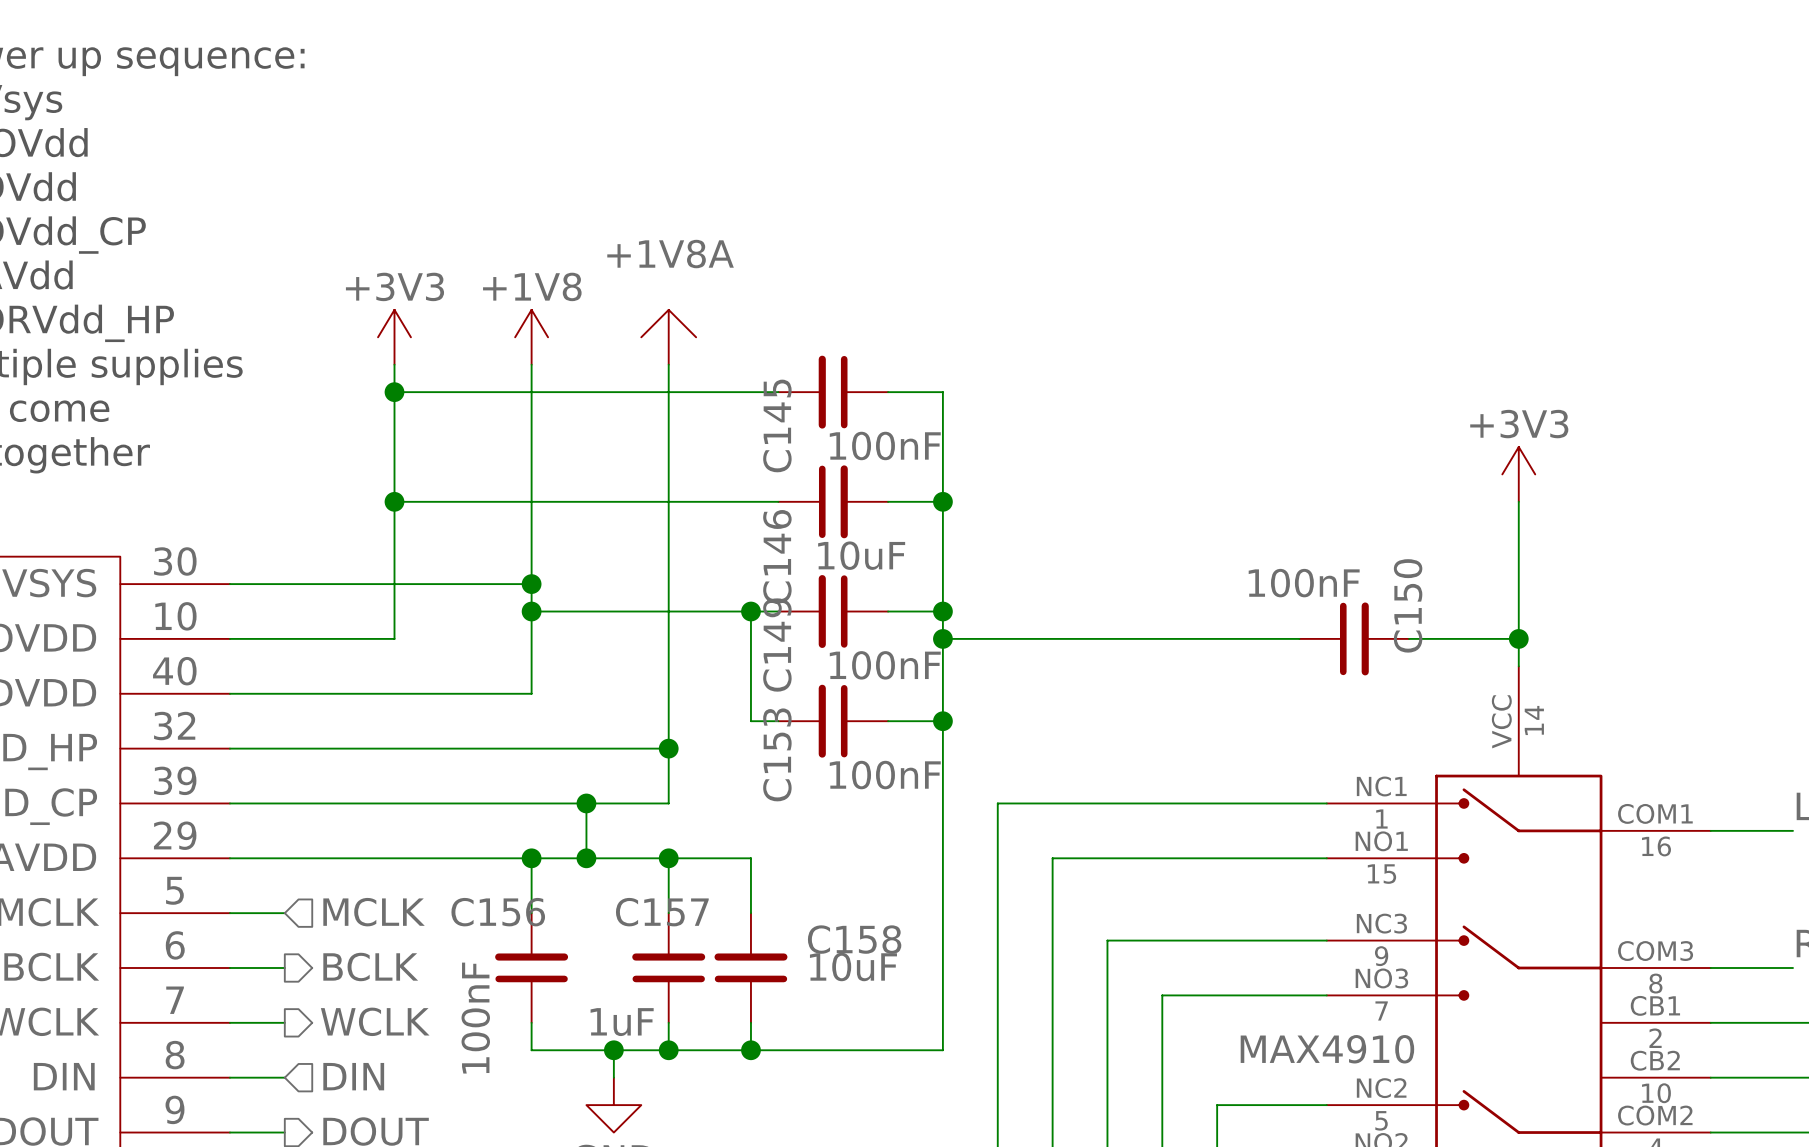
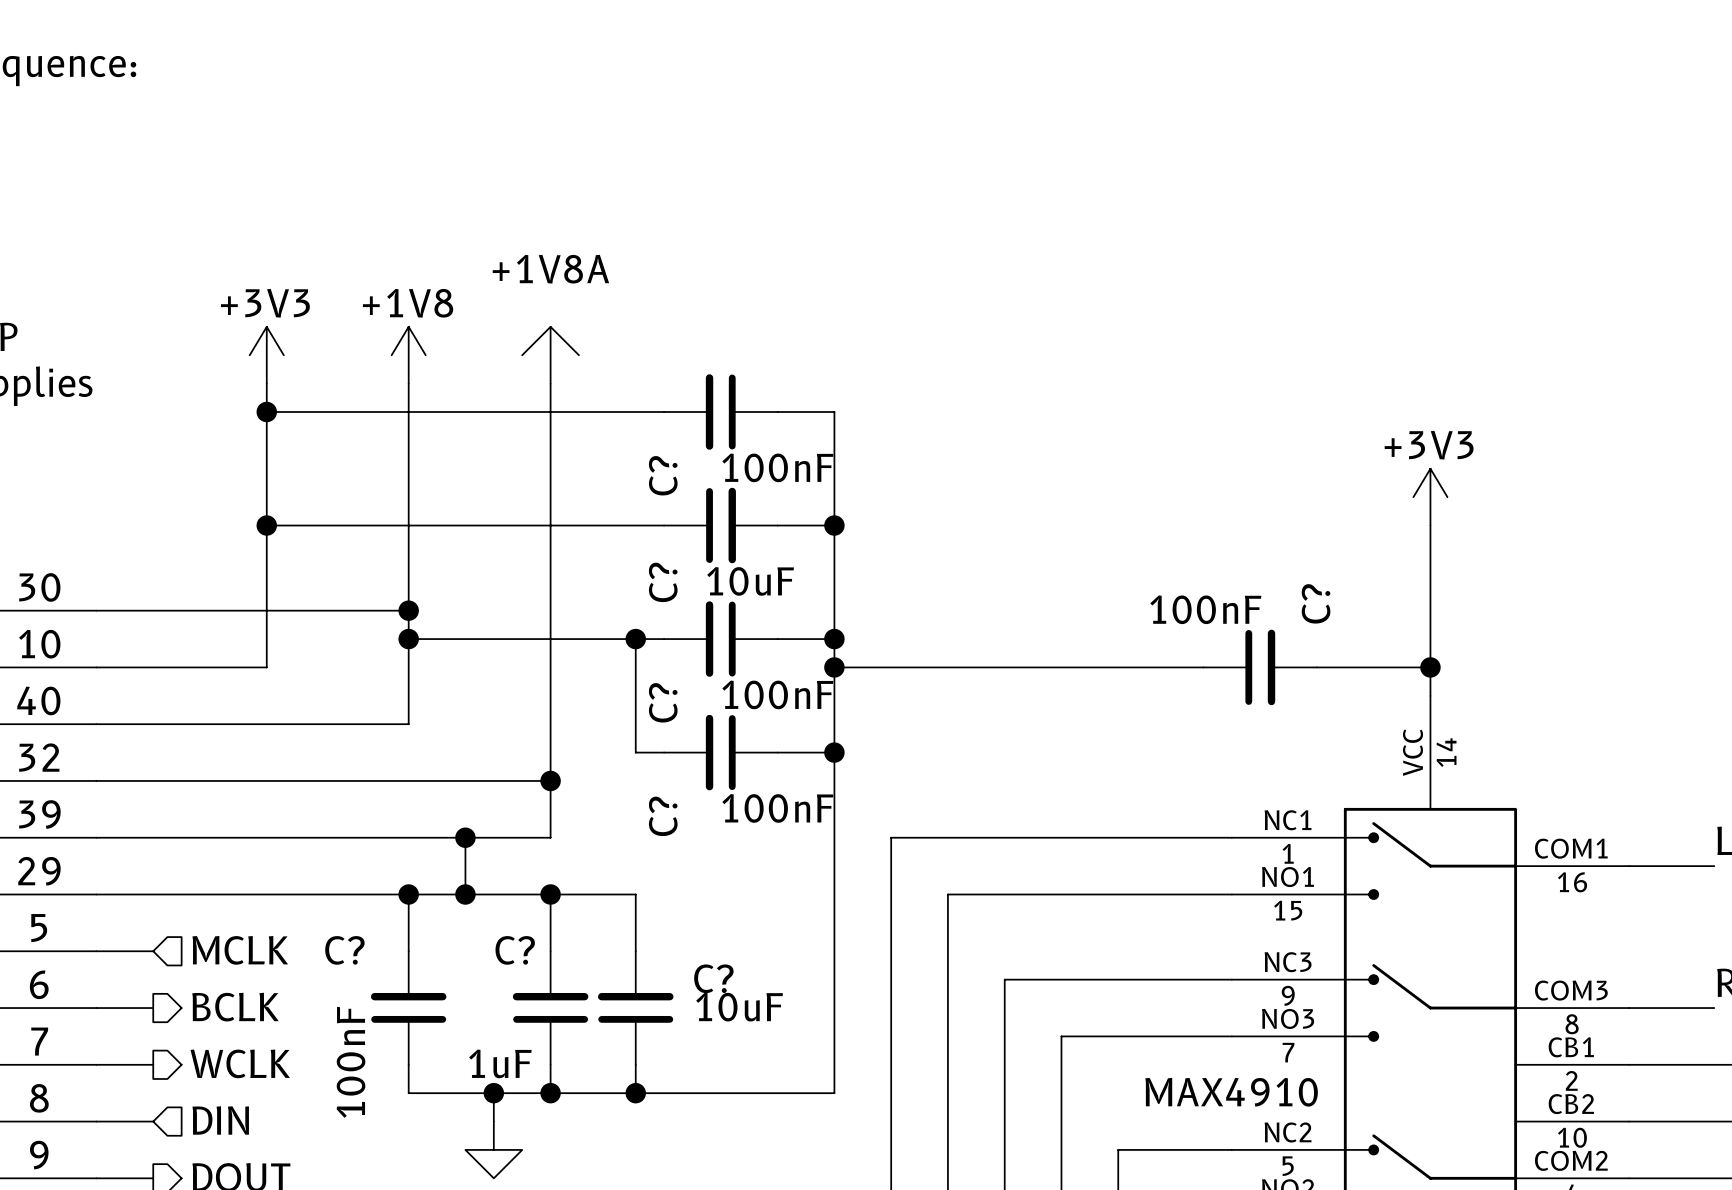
C145 name: C145 (777, 425) -> C? (663, 475)
C146 name: C146 (777, 556) -> C? (663, 582)
C150 name: C150 (1408, 605) -> C? (1316, 603)
C149 name: C149 (777, 645) -> C? (663, 702)
C153 name: C153 (777, 754) -> C? (663, 816)
C156 name: C156 (498, 912) -> C? (344, 950)
C157 name: C157 (662, 912) -> C? (515, 950)
C158 name: C158 (854, 939) -> C? (713, 978)

